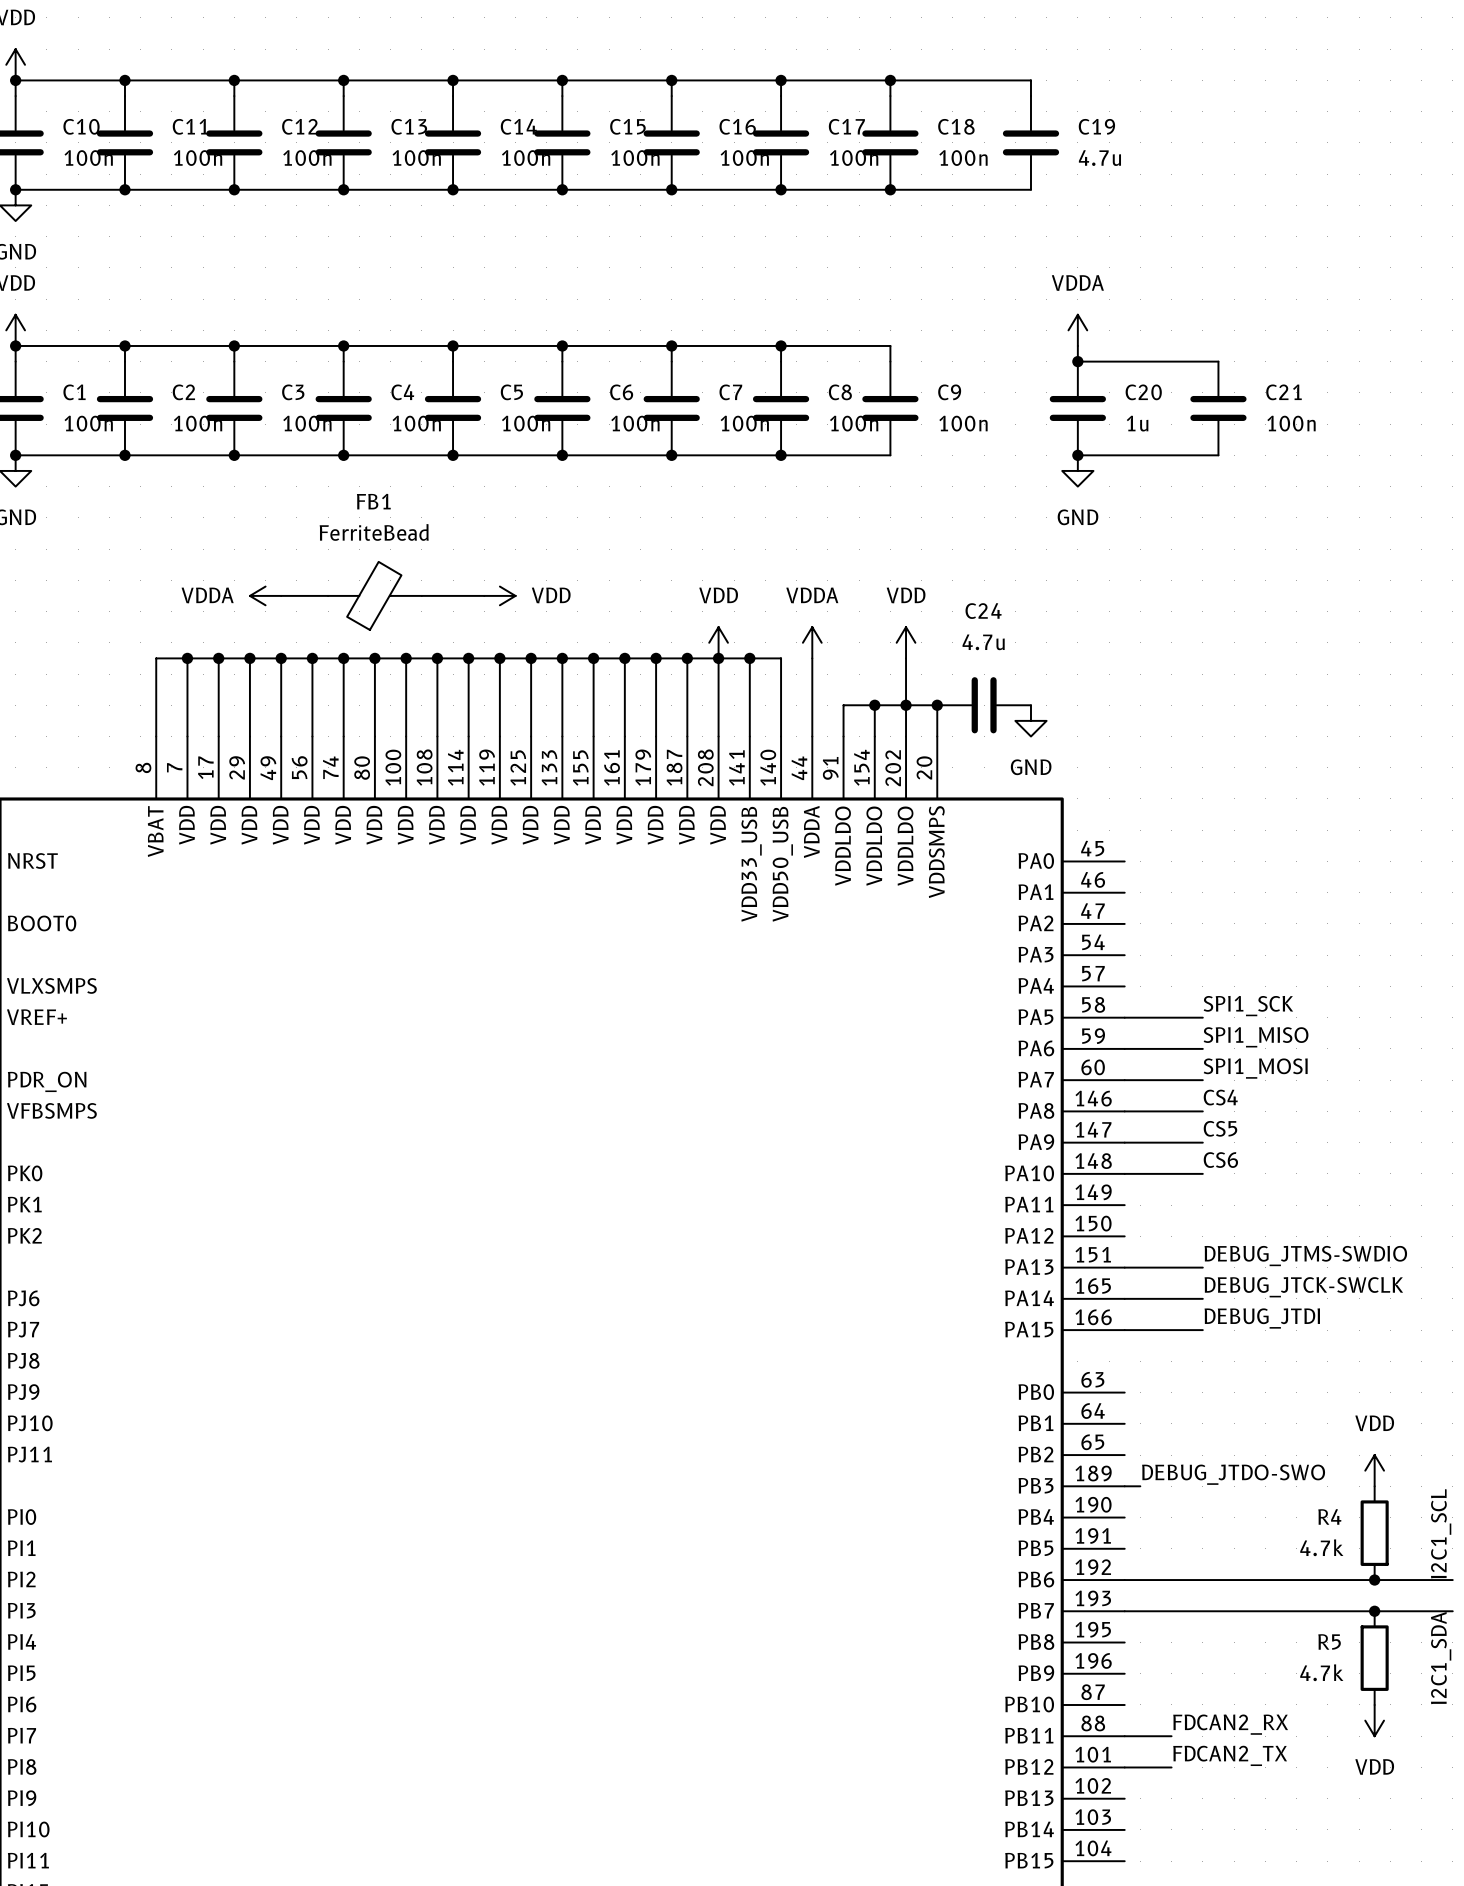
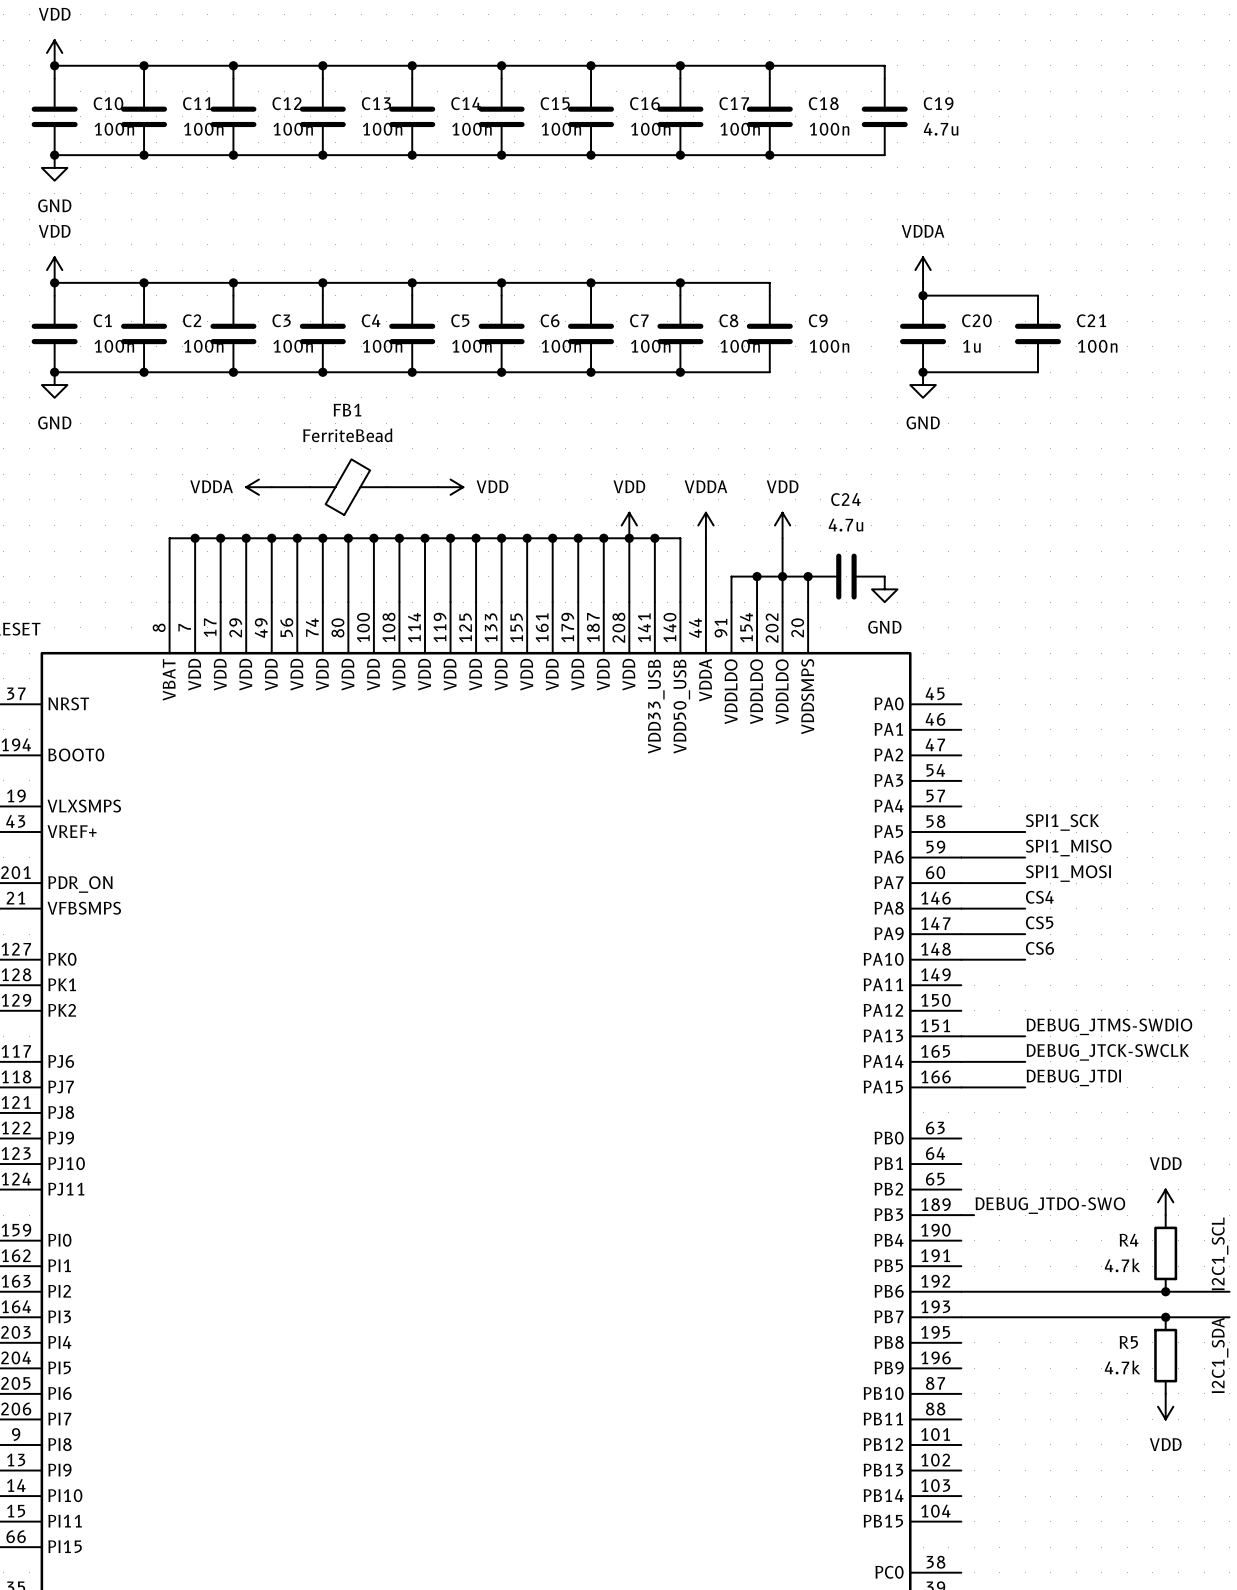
label: FDCAN2_RX (1230, 1724) -> none
wire: (1124, 1736) (1171, 1736) -> none
label: FDCAN2_TX (1230, 1755) -> none
wire: (1124, 1767) (1171, 1767) -> none

